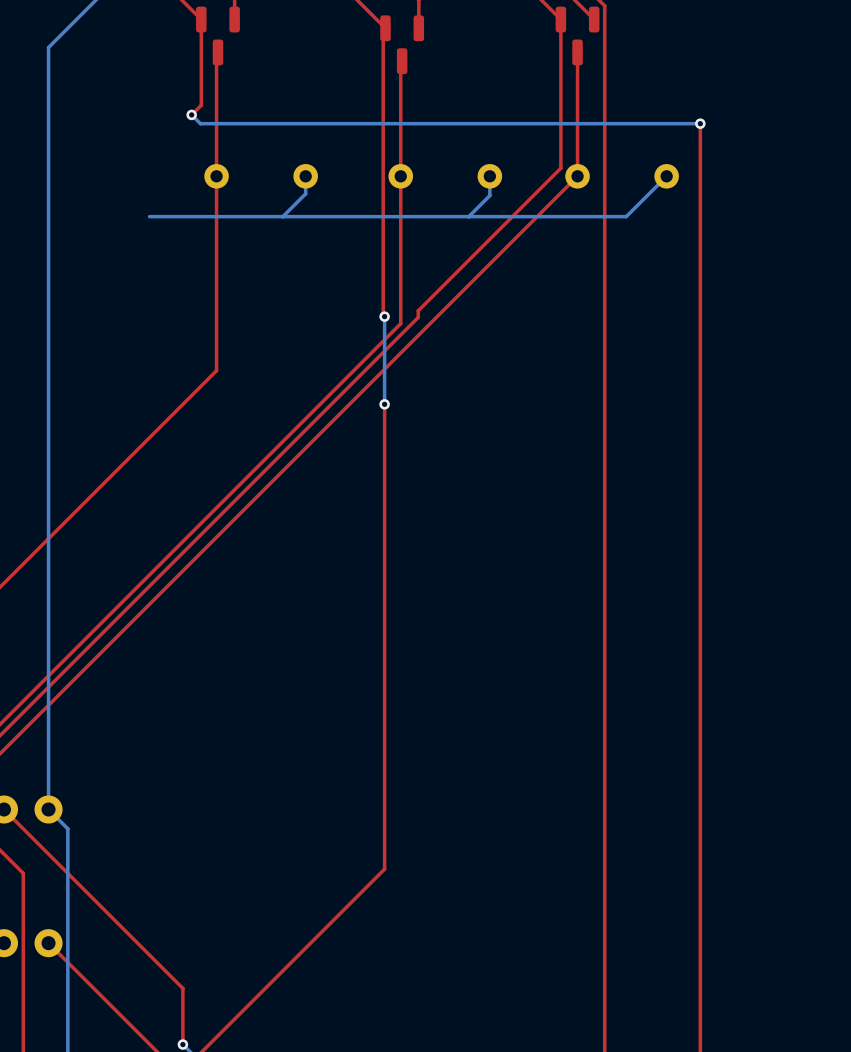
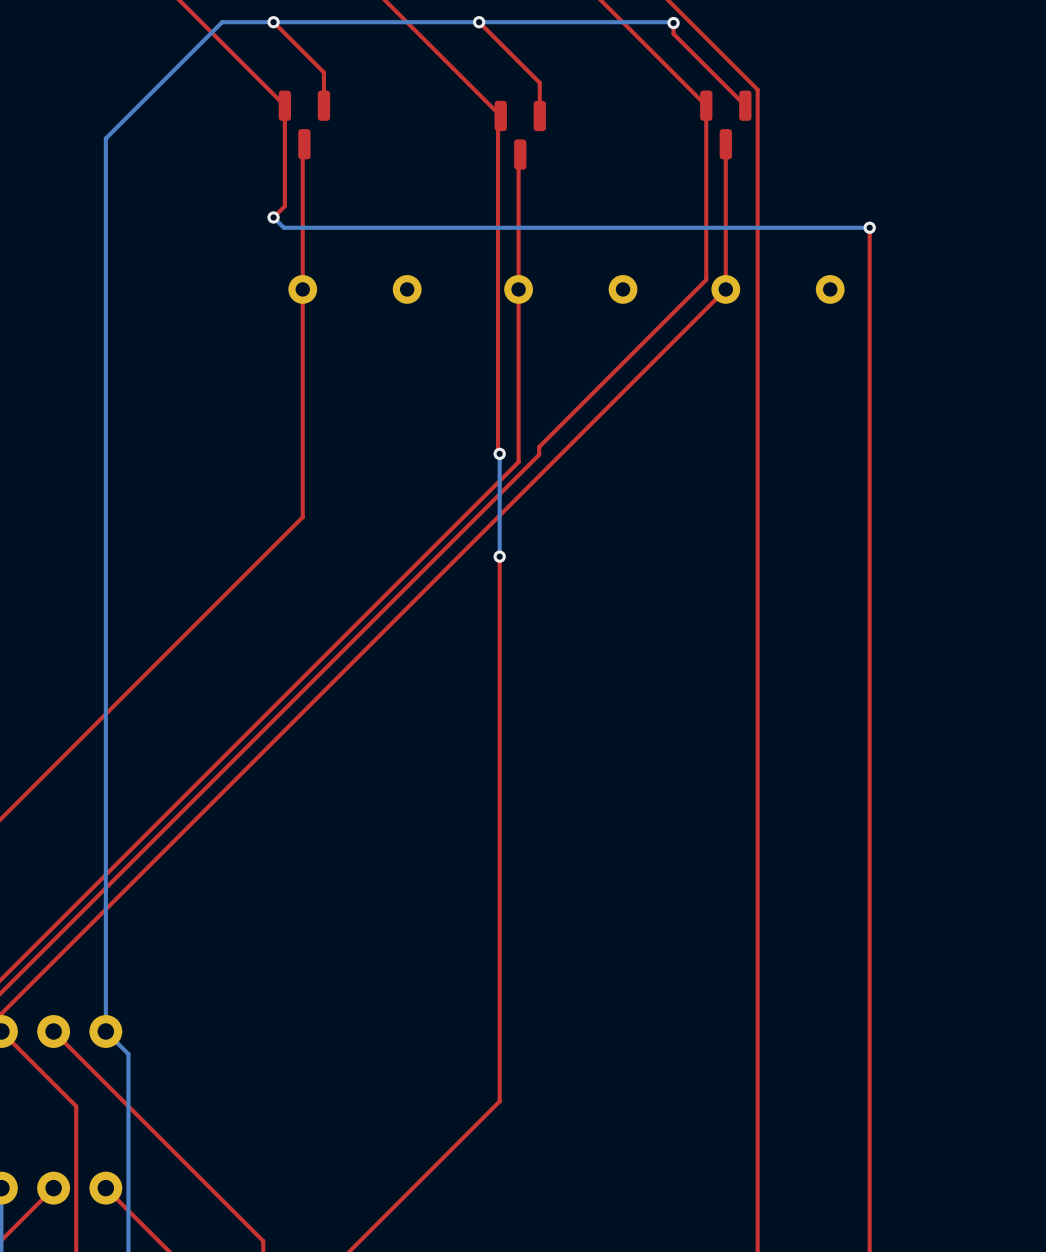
bottom track: (305, 176) (305, 193) (282, 216) -> none
bottom track: (489, 176) (489, 195) (468, 216) -> none
bottom track: (666, 176) (626, 216) (149, 216) -> none

